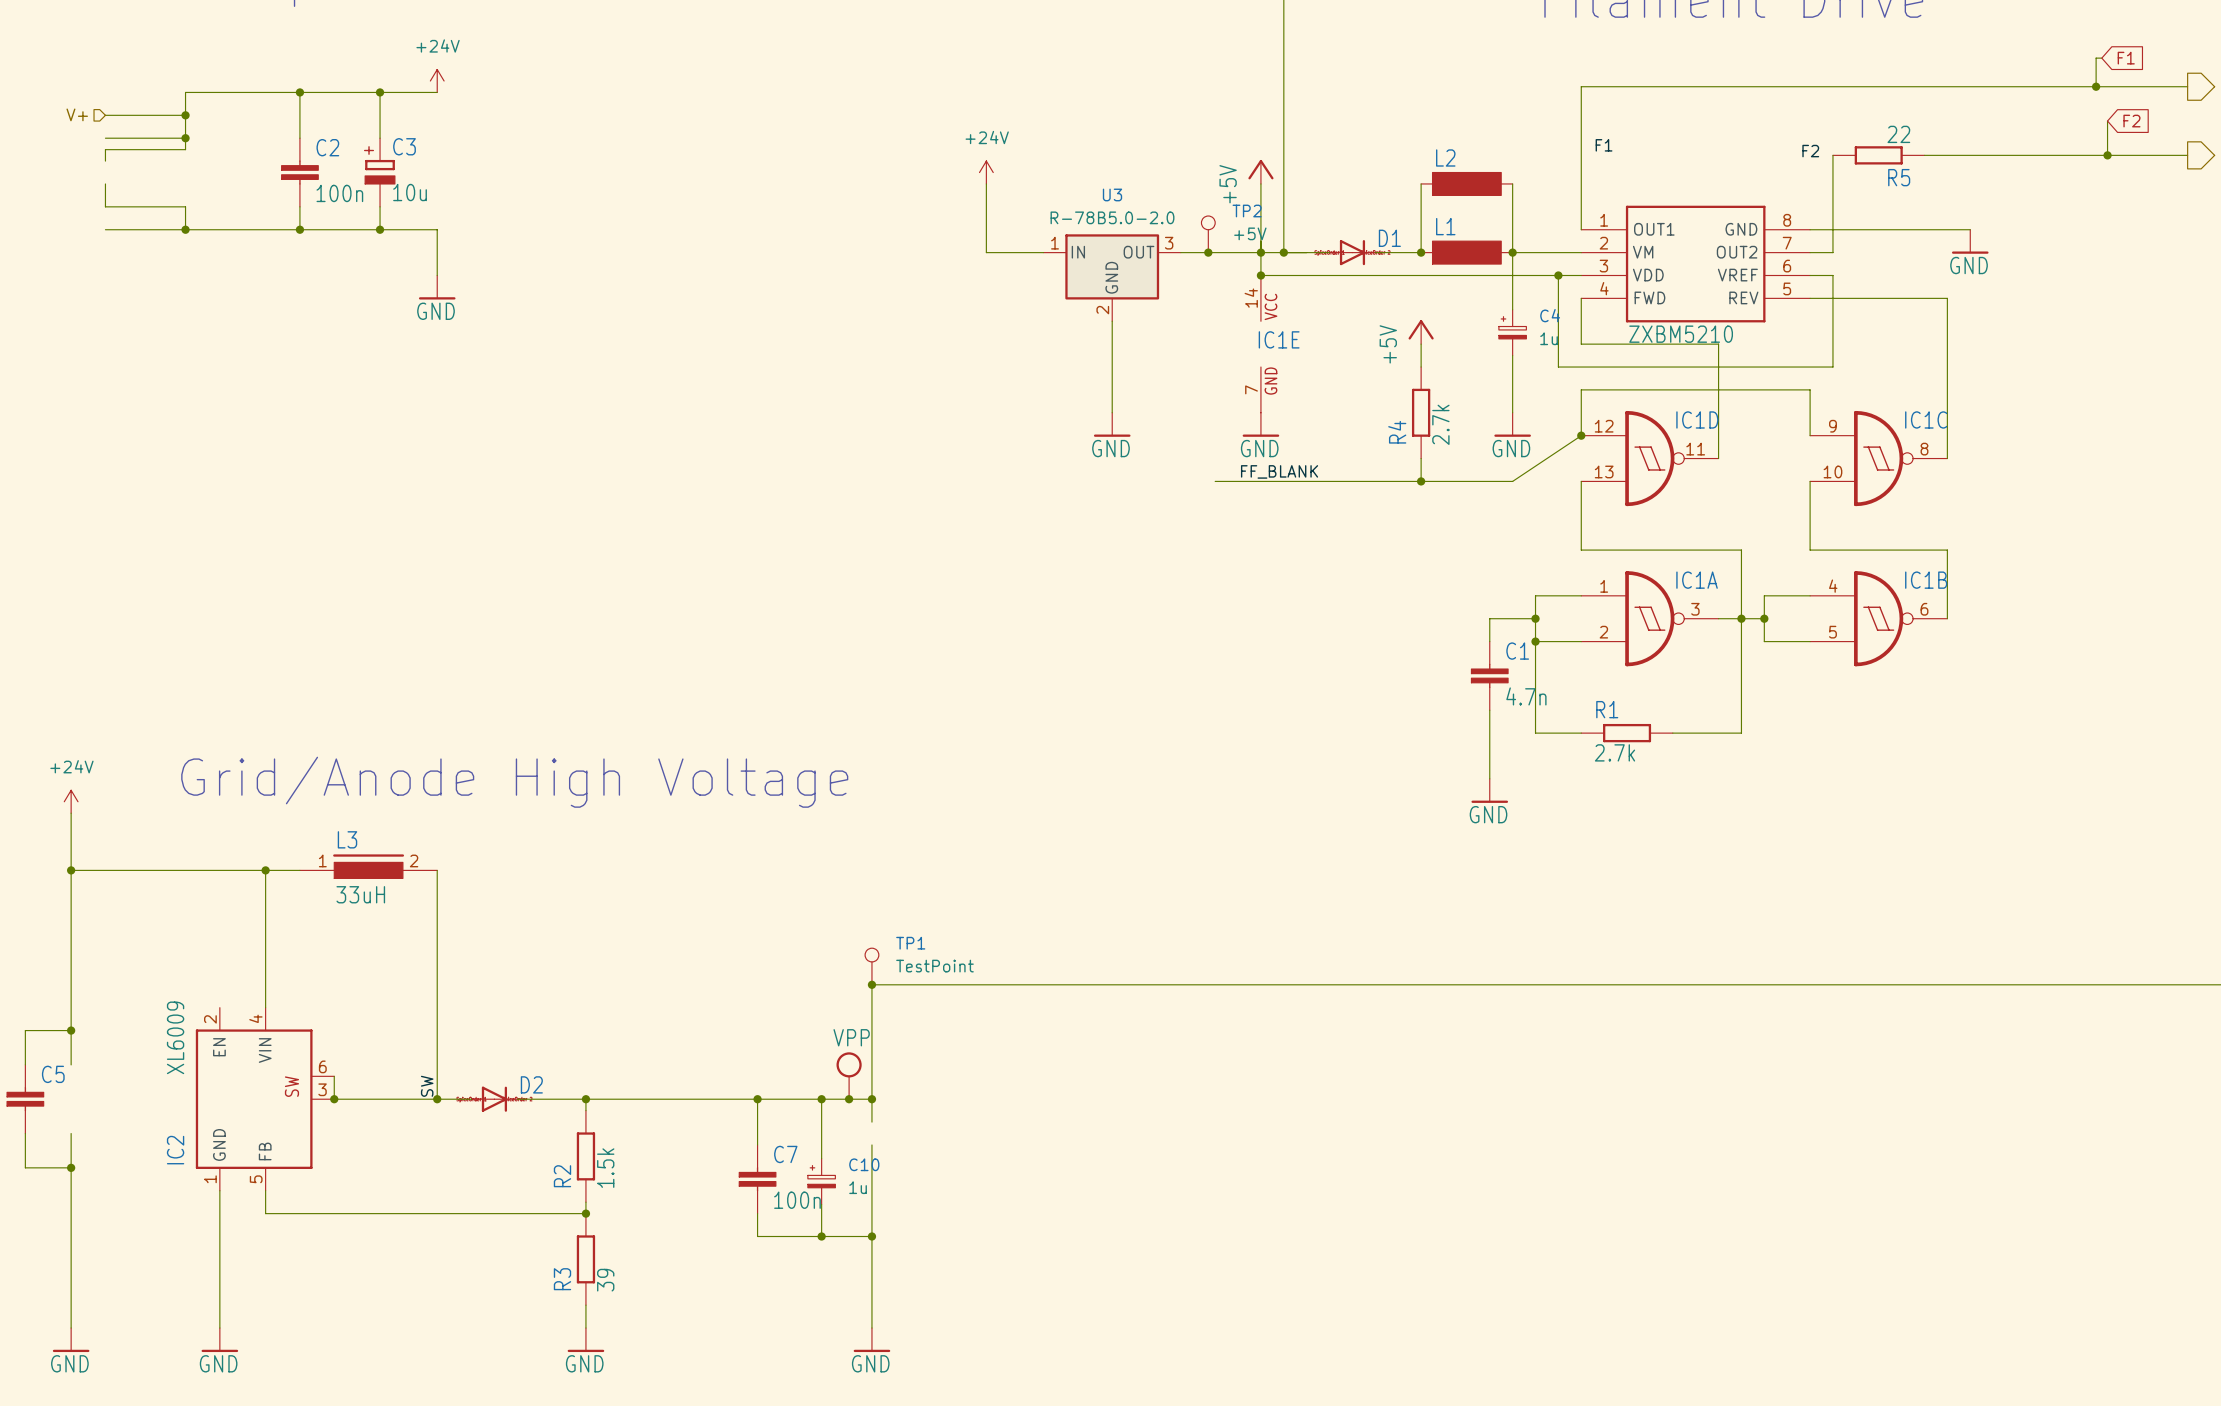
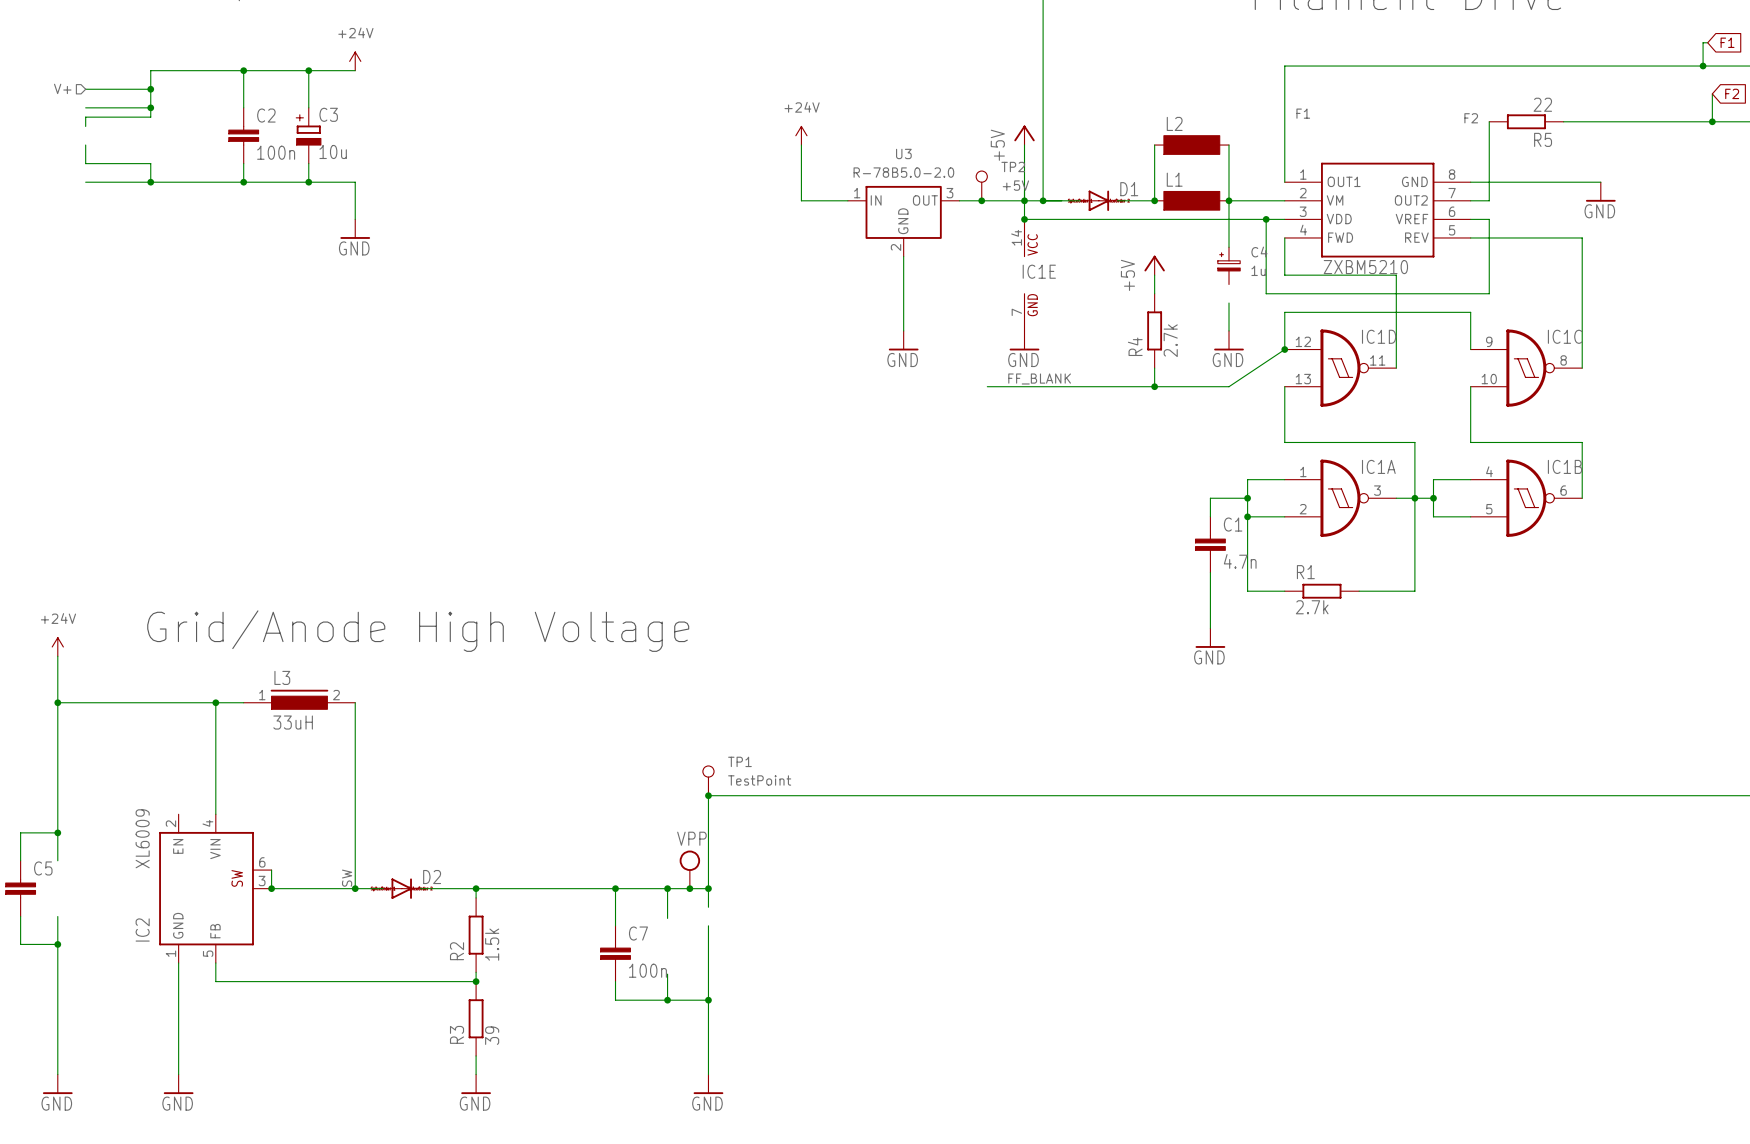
wire: (1512, 355) (1512, 378) -> none
wire: (821, 1135) (821, 1158) -> none
C10: 1u (821, 1181) -> none

